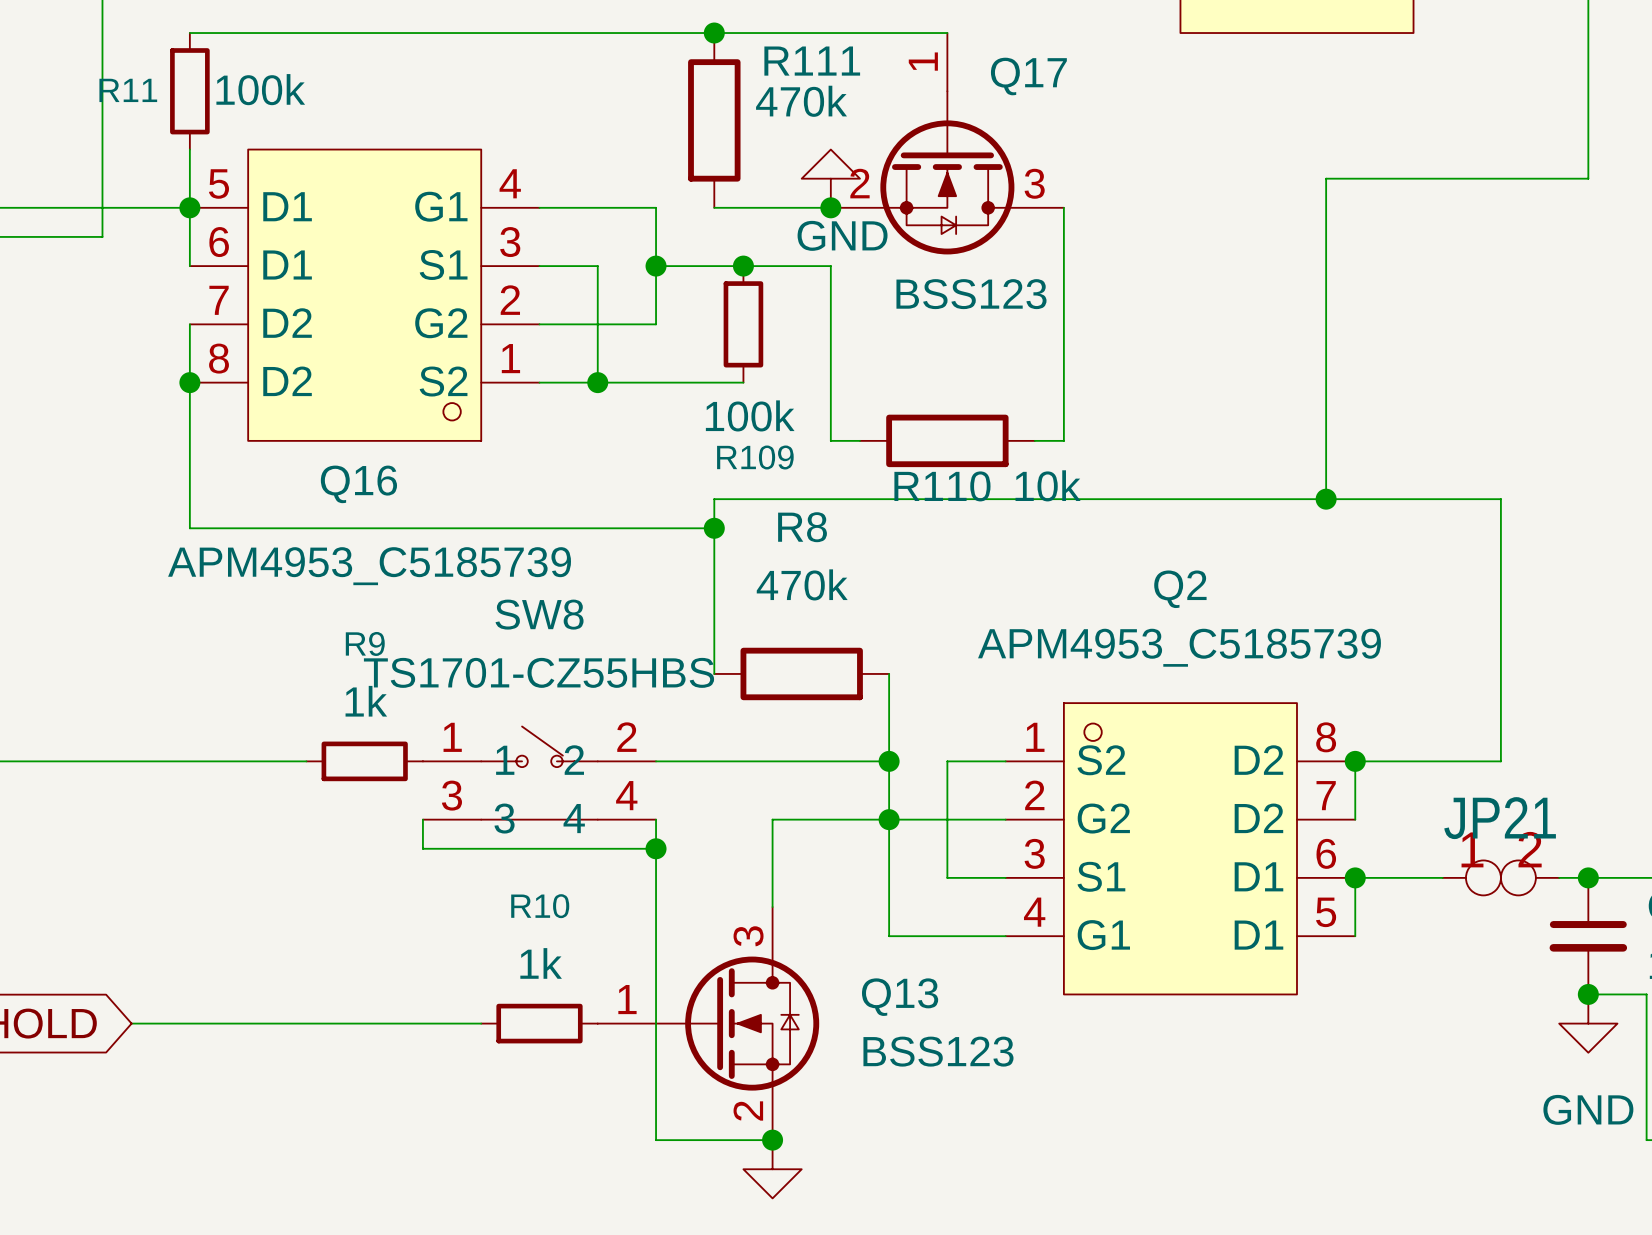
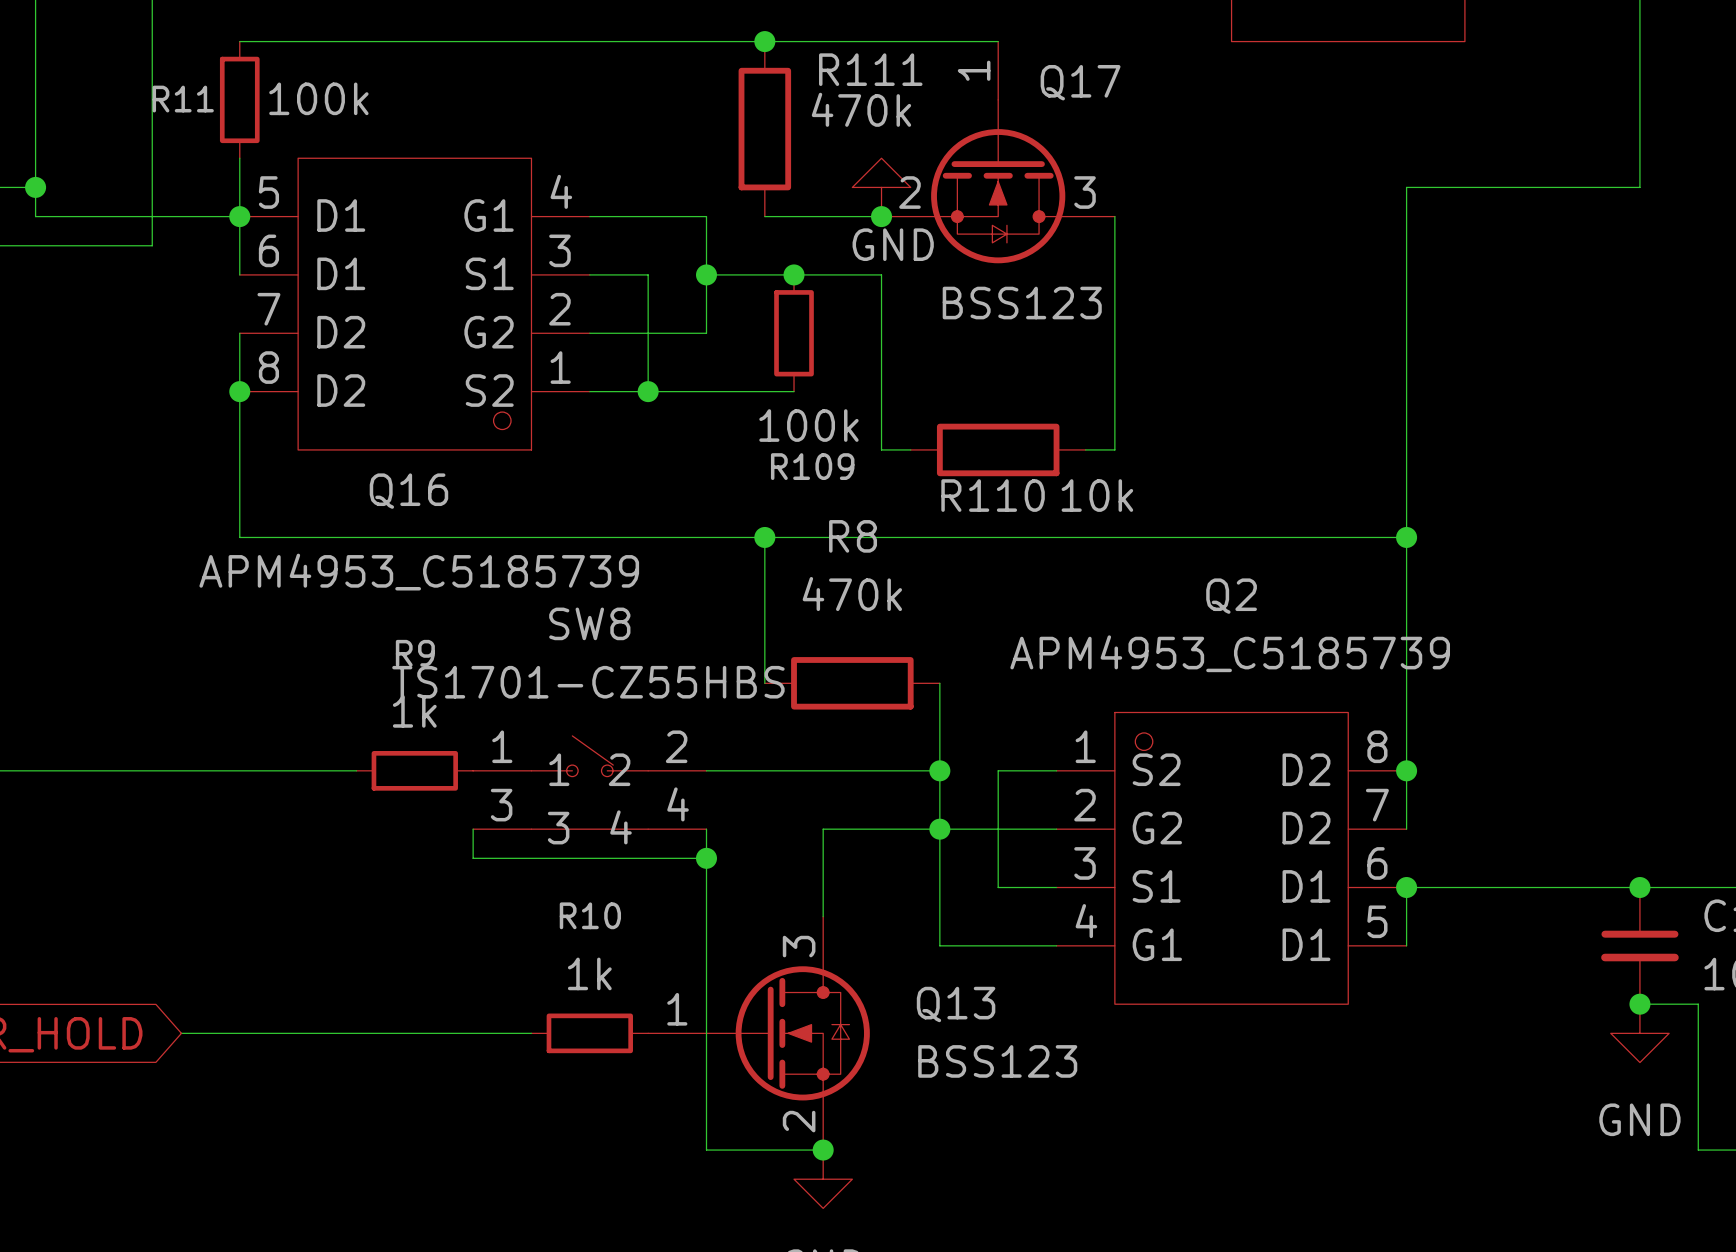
wire: (1355, 178) (1326, 178) (1326, 499) -> (1406, 187) (1406, 770)
junction position: (1326, 499) -> (1406, 537)
wire: (714, 528) (714, 499) (1500, 499) (1500, 761) (1355, 761) -> (764, 537) (1406, 537)
wire: none -> (1494, 887) (1610, 887)
JP21: (1500, 877) -> none

